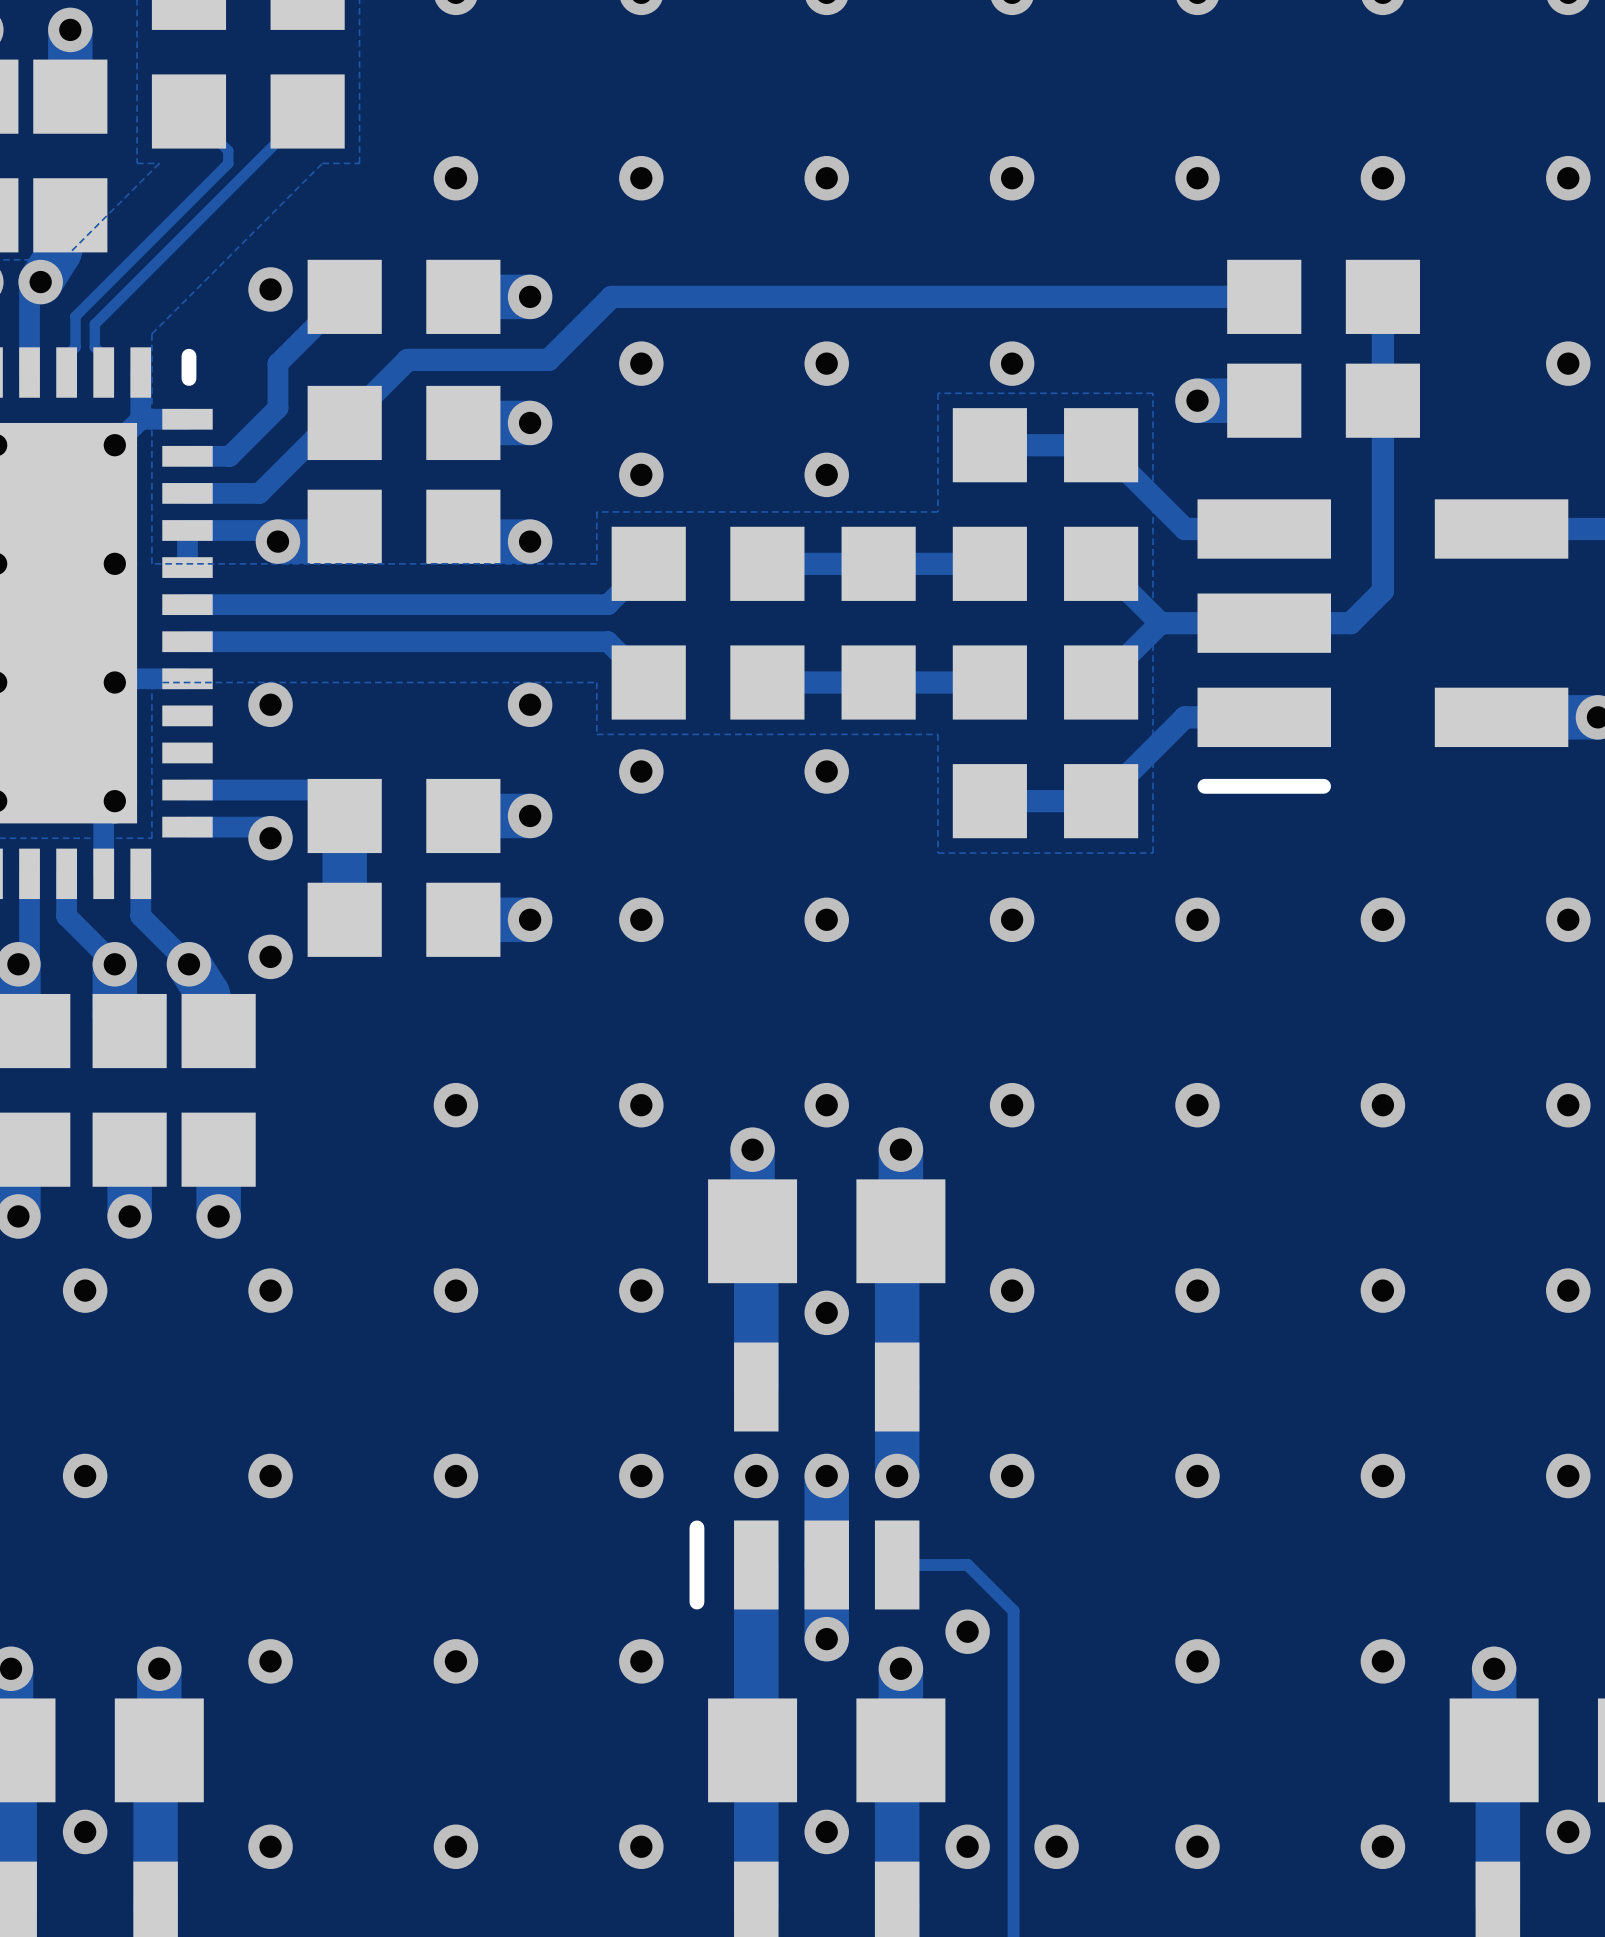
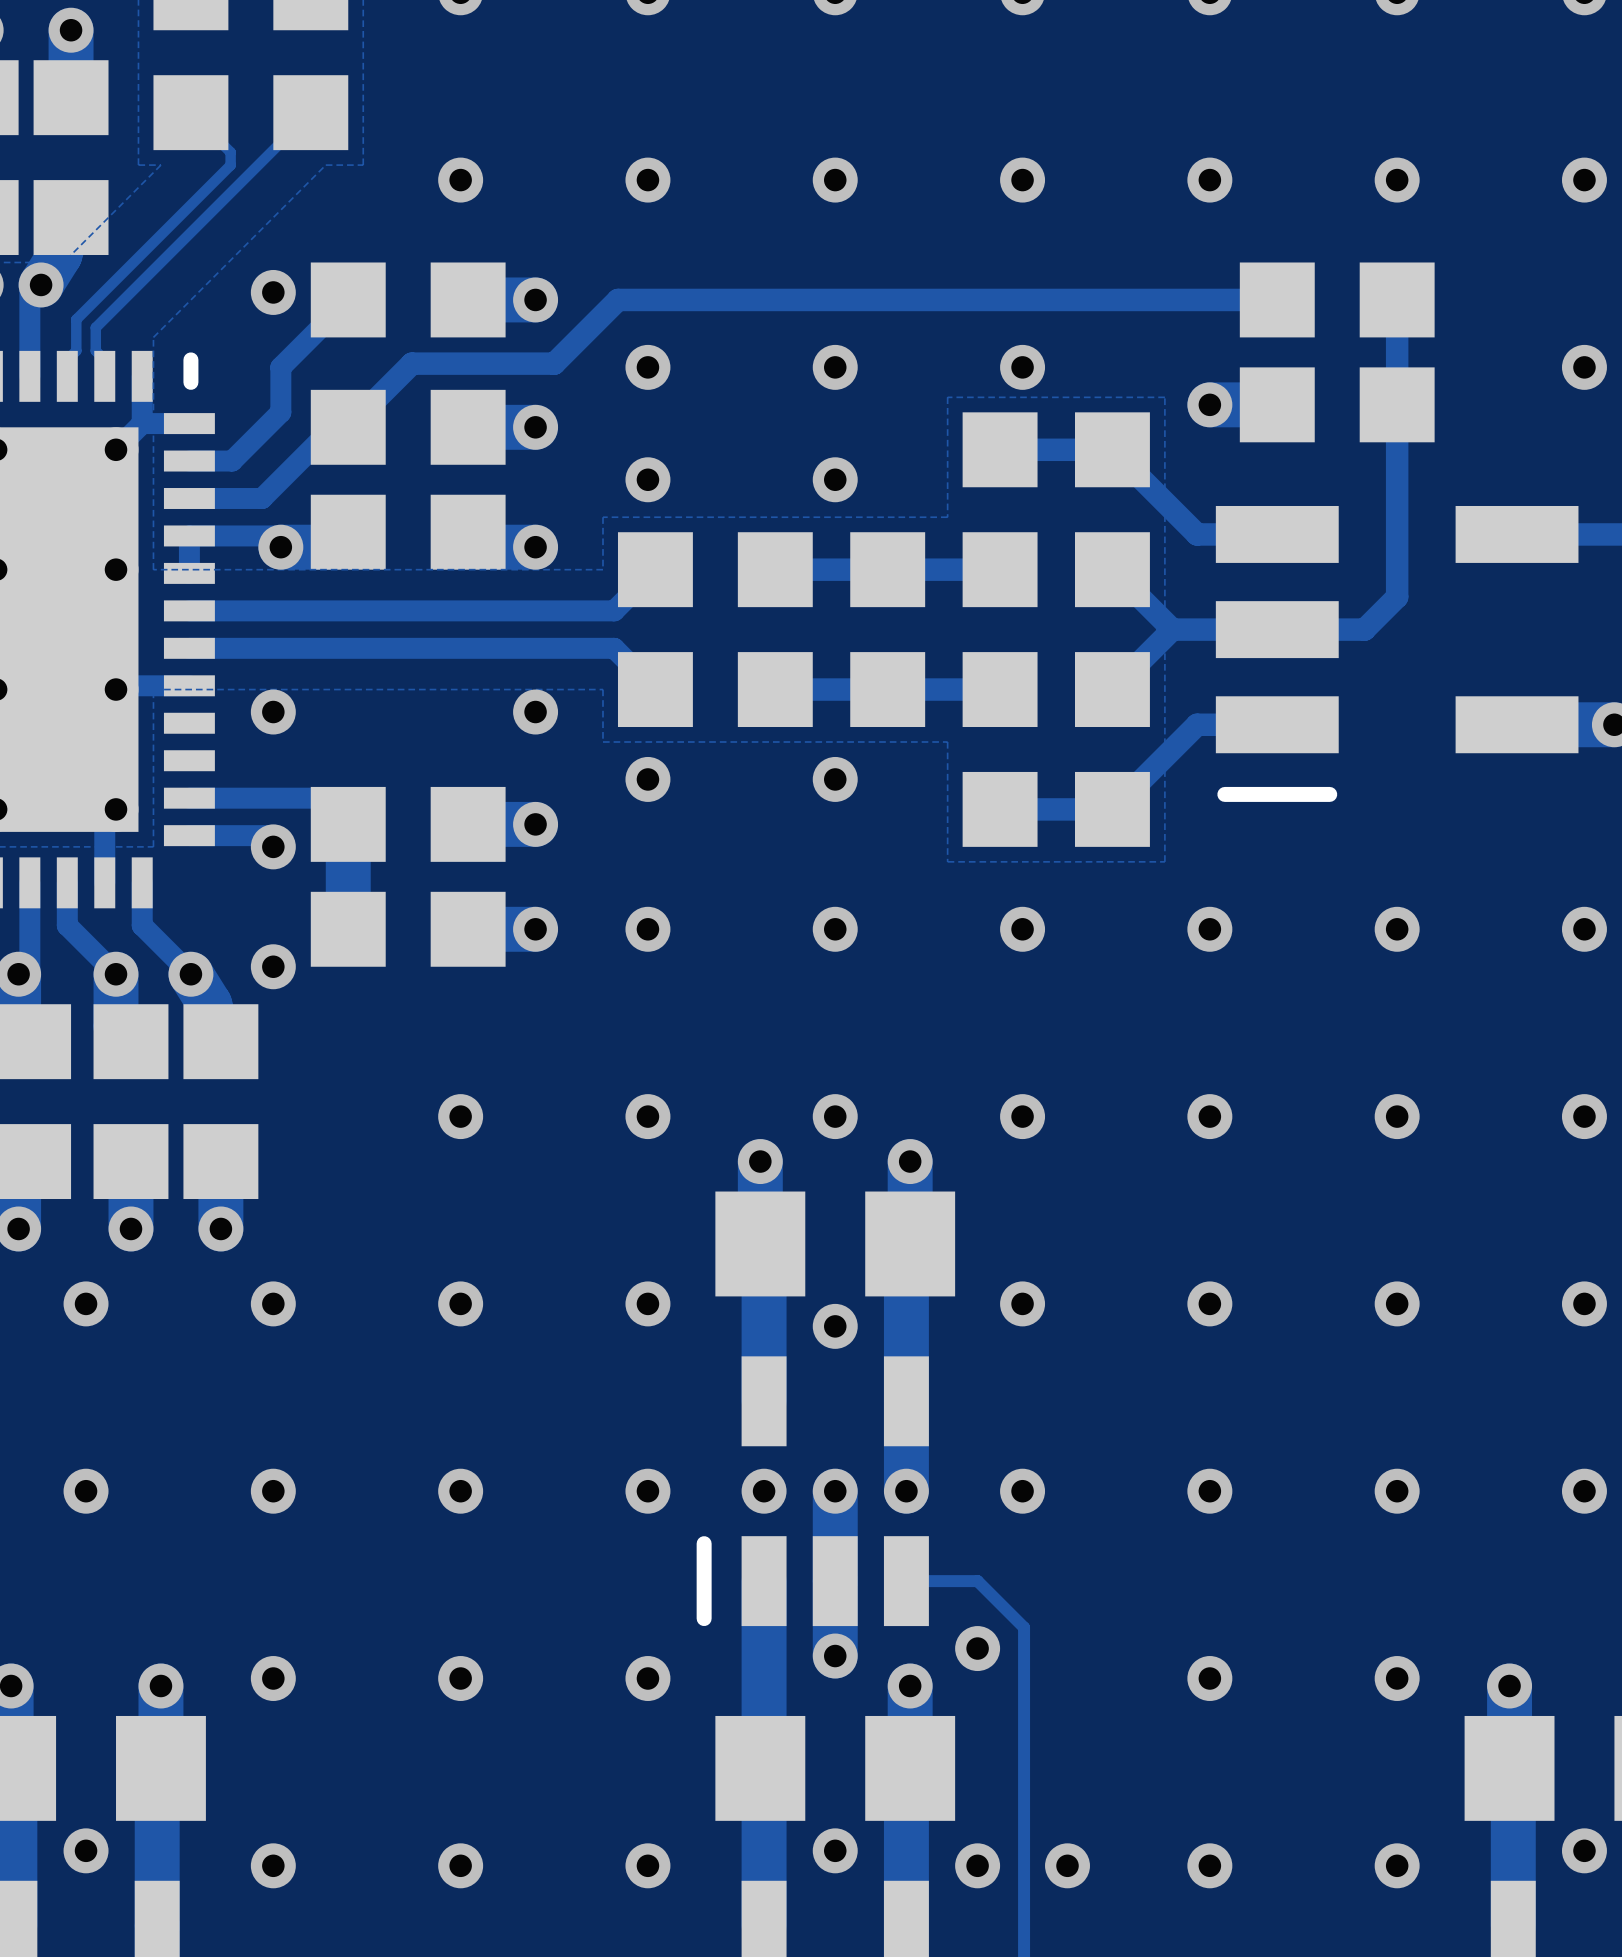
part footprint: [1197, 499, 1569, 794] -> [1215, 505, 1579, 802]

